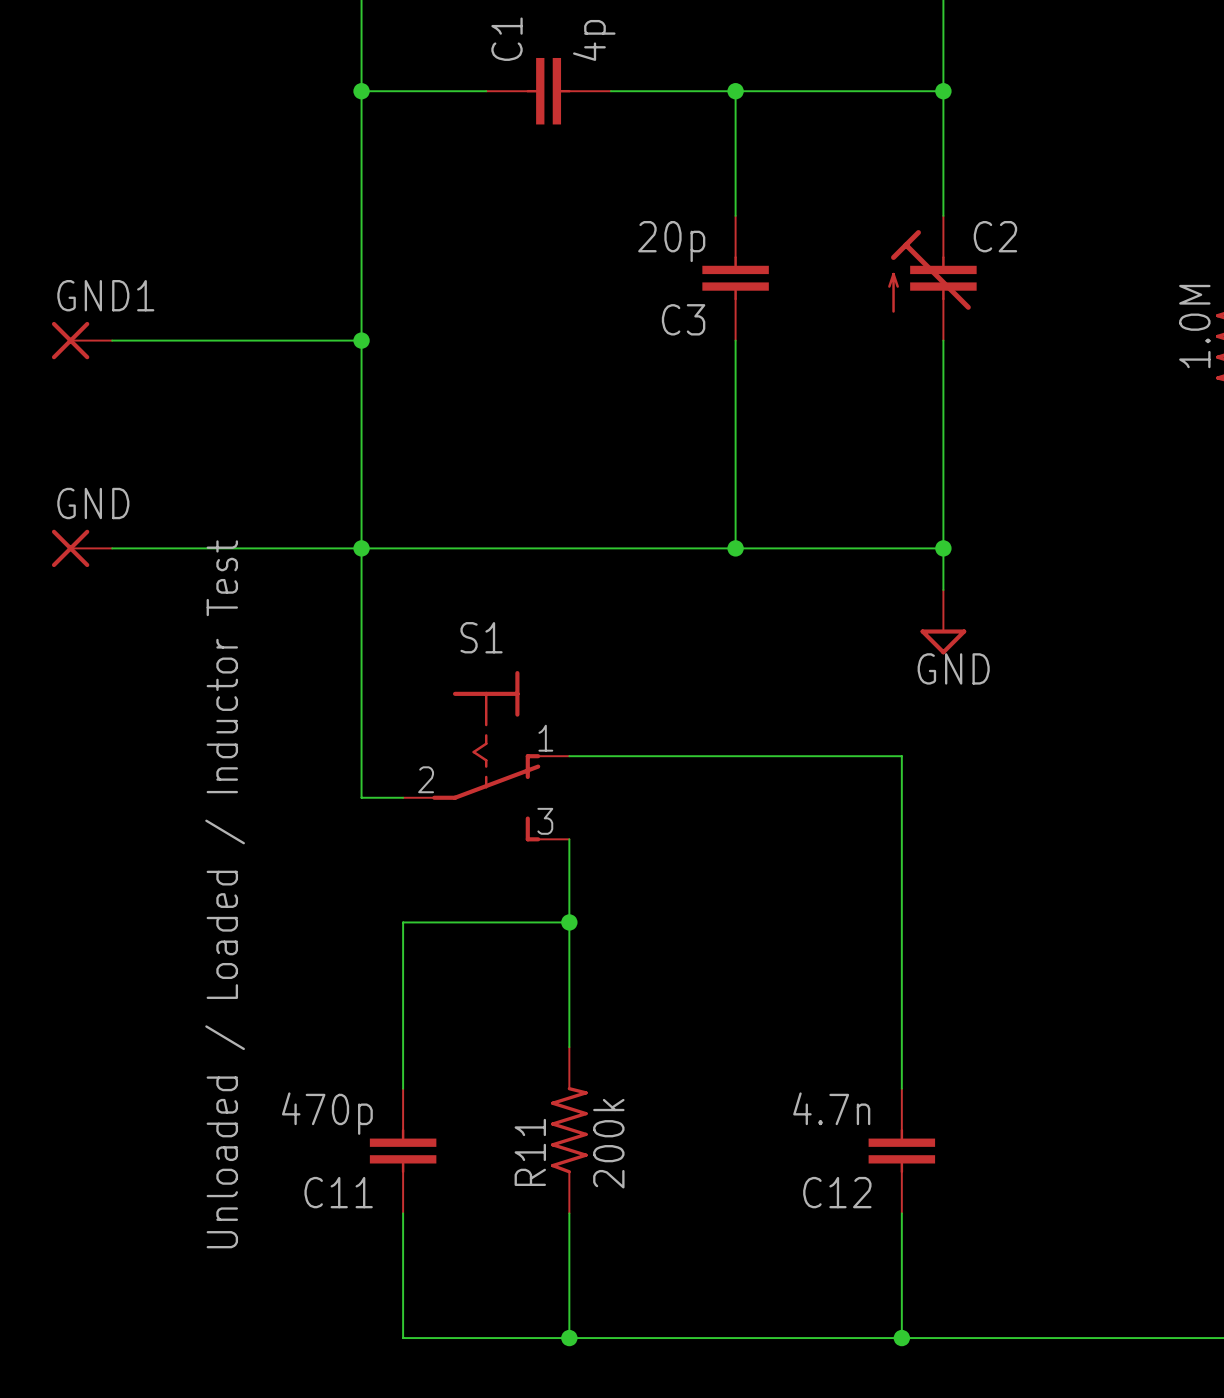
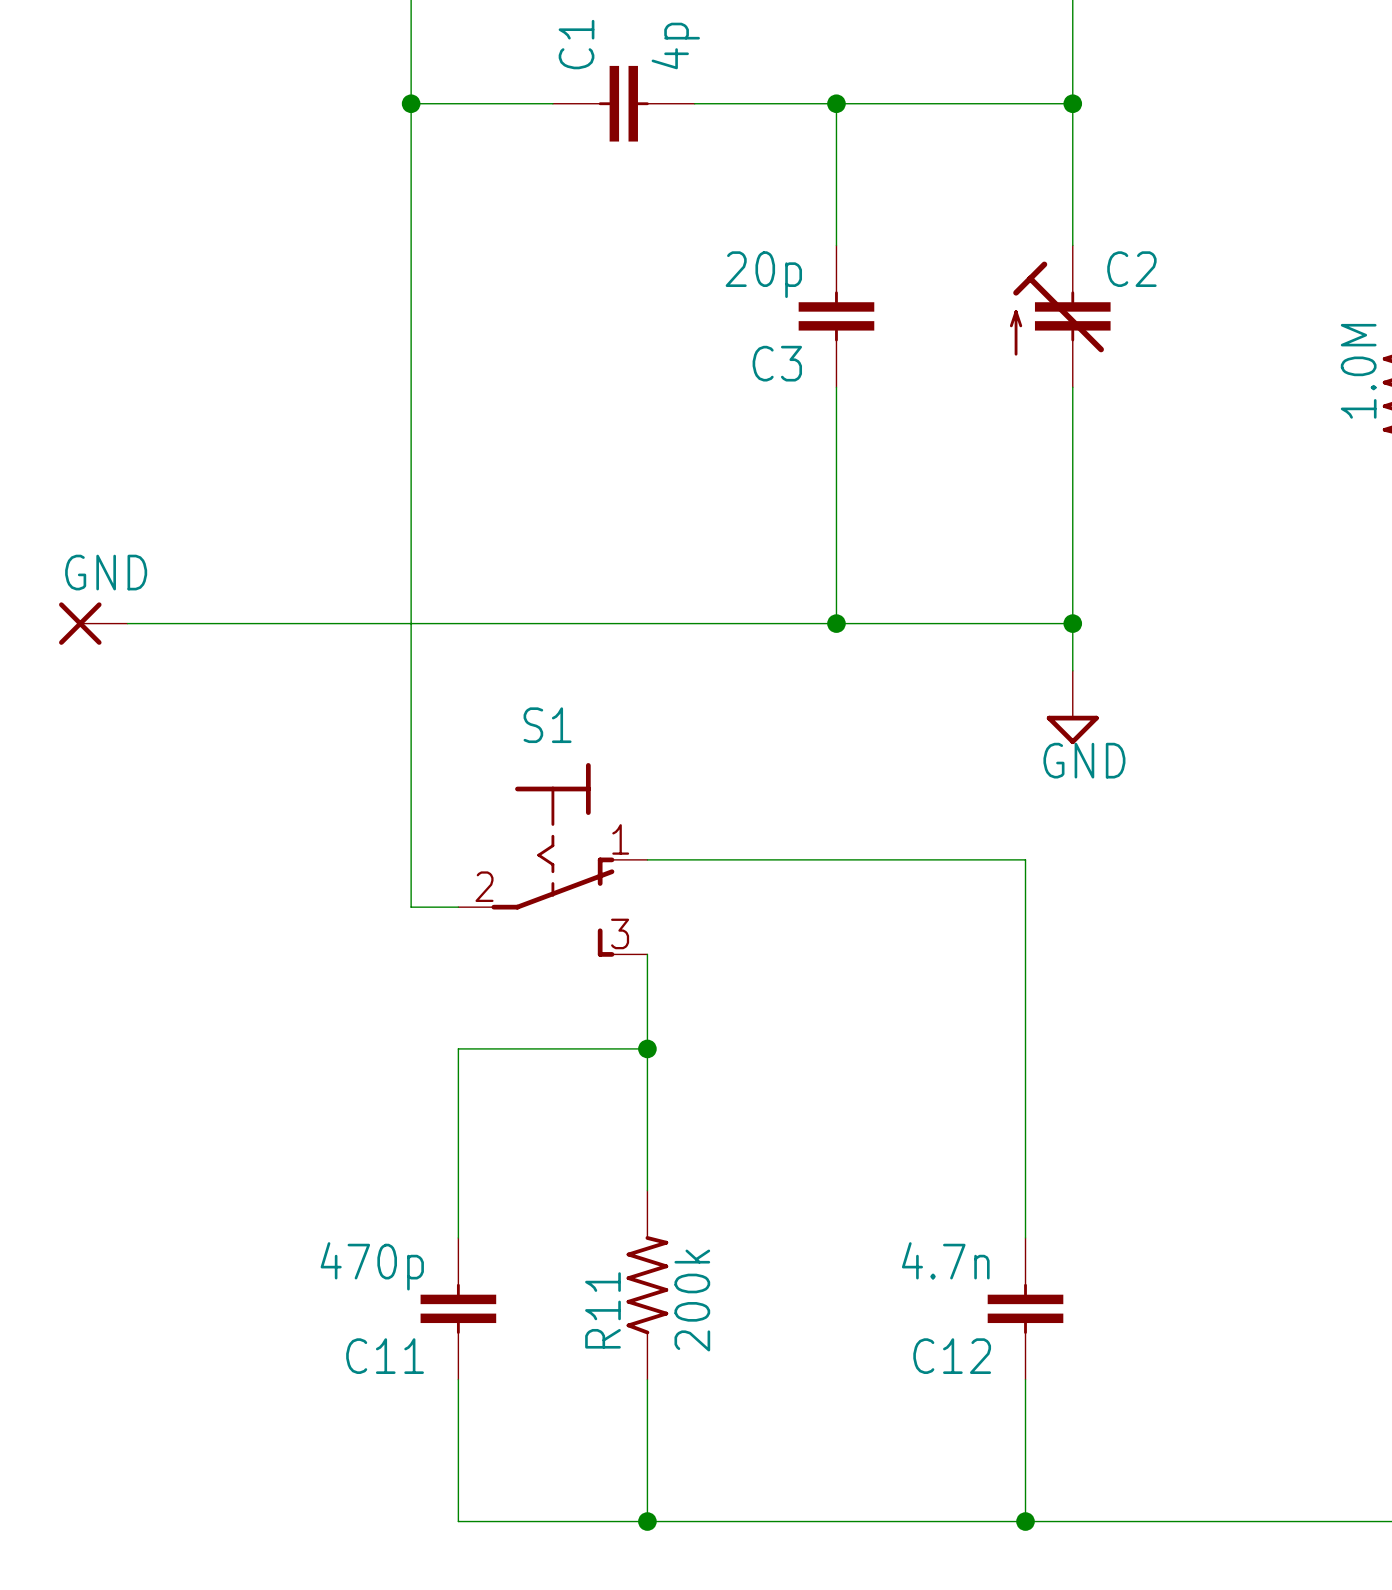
GND1: (82, 340) -> none
wire: (112, 340) (361, 340) -> none
junction: (361, 340) -> none
junction: (361, 548) -> none
text: Unloaded / Loaded / Inductor Test (225, 894) -> none

